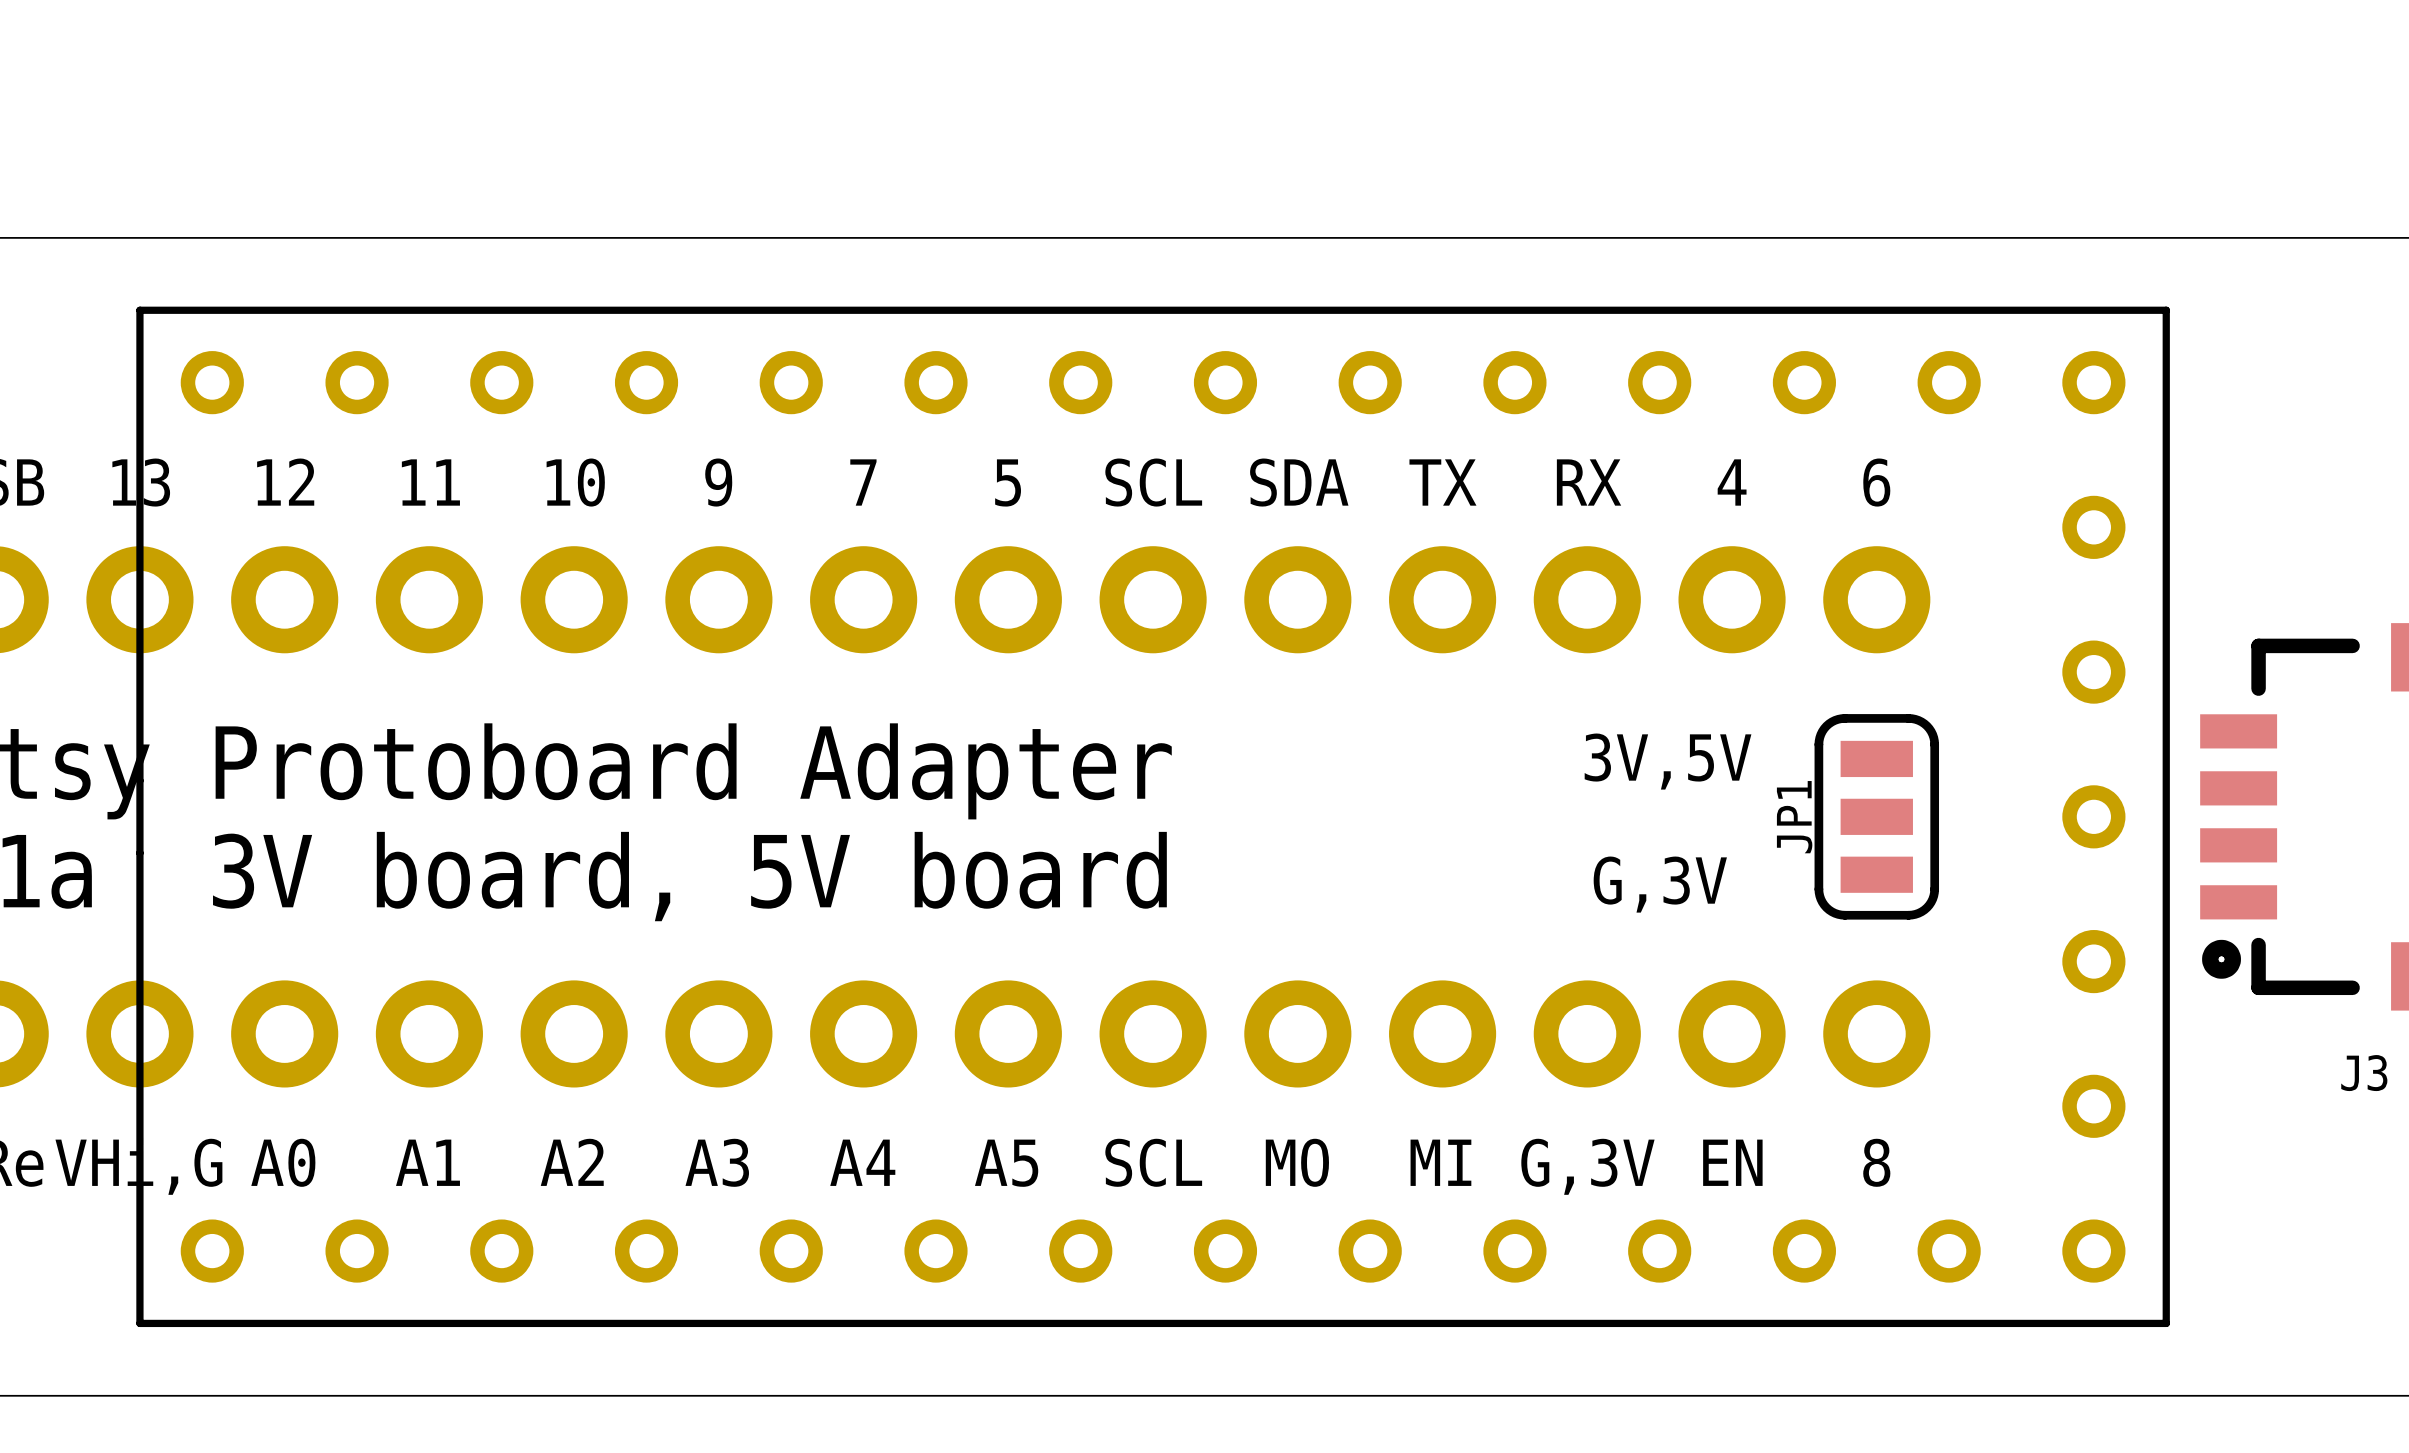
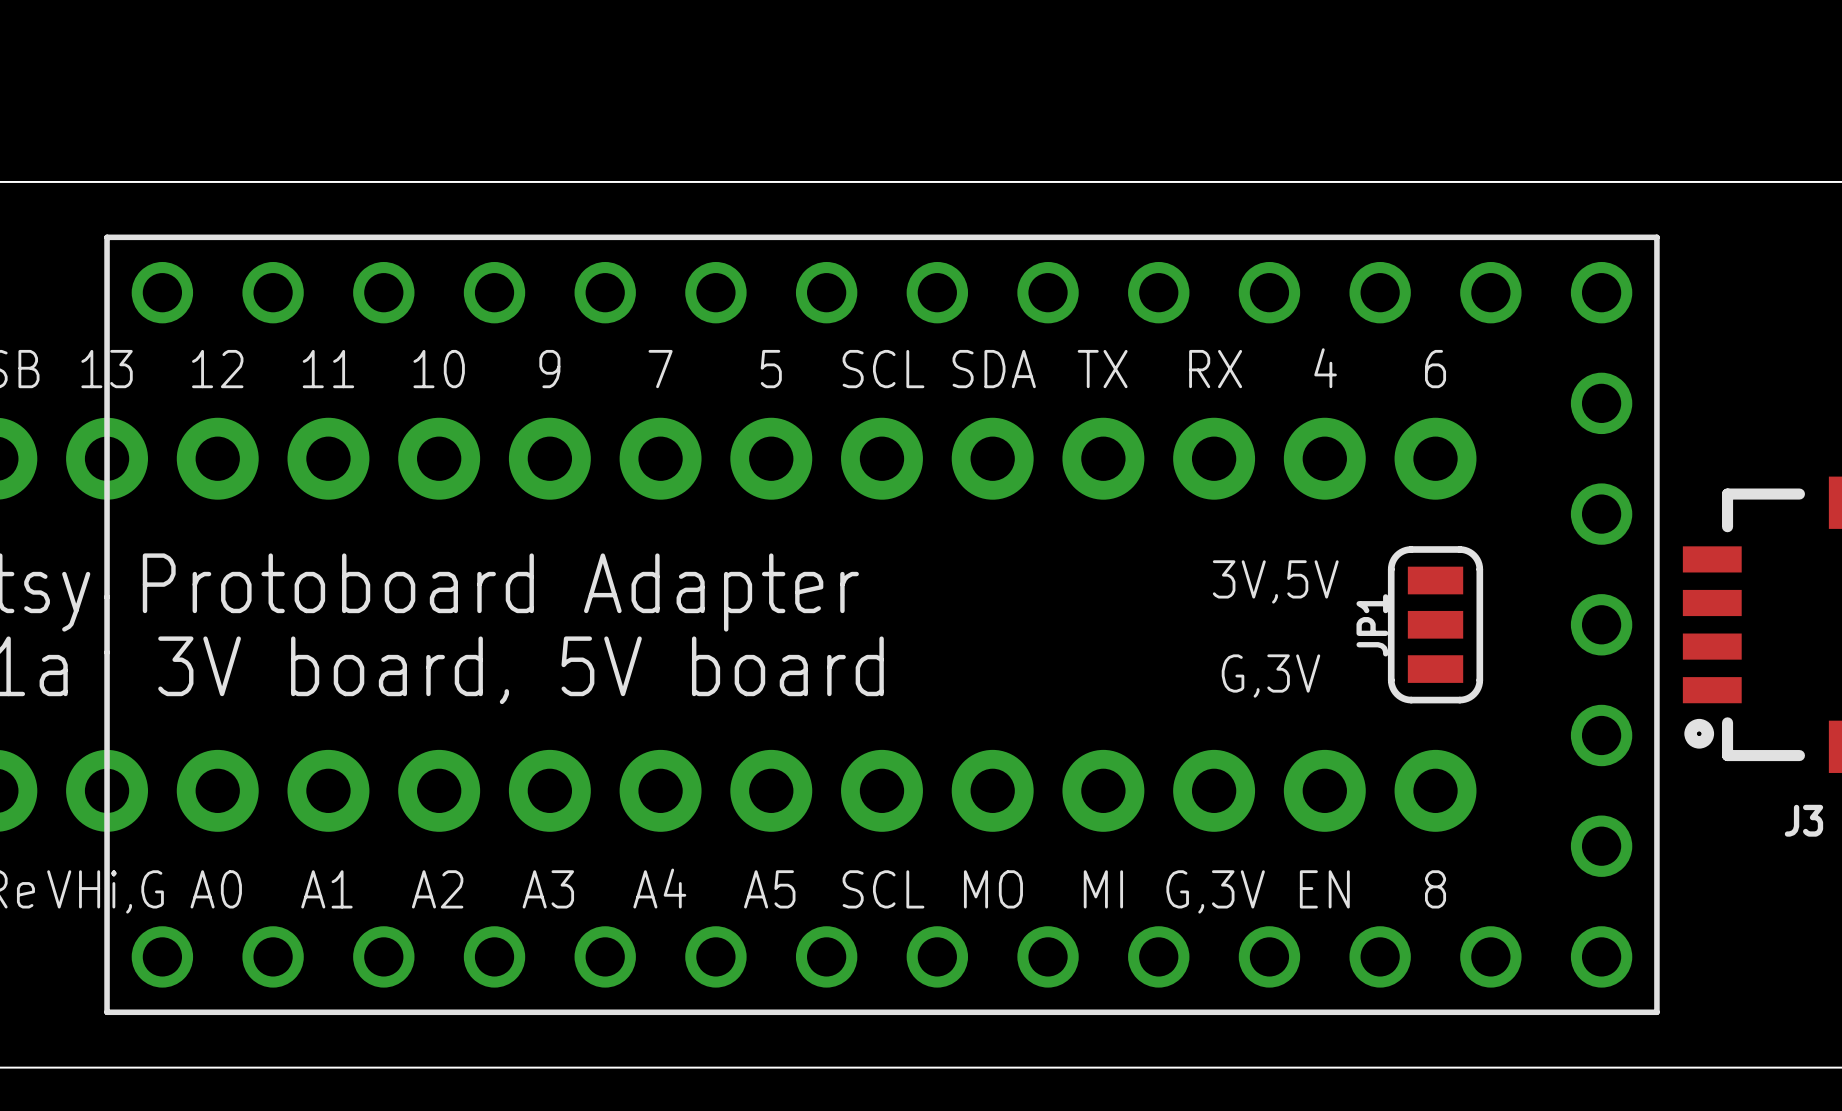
part footprint: [136, 306, 2170, 1328] -> [104, 234, 1660, 1016]

